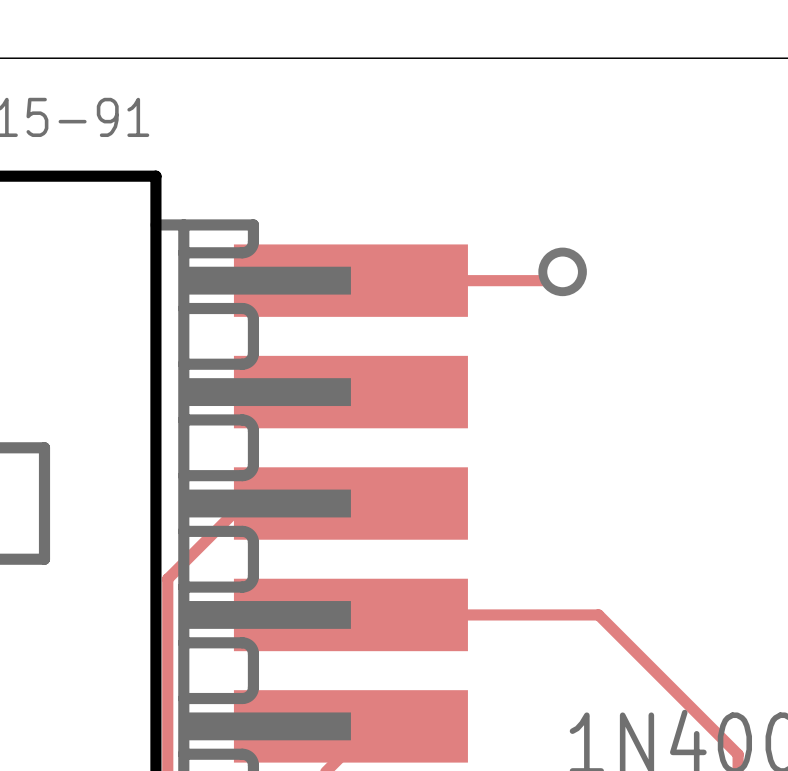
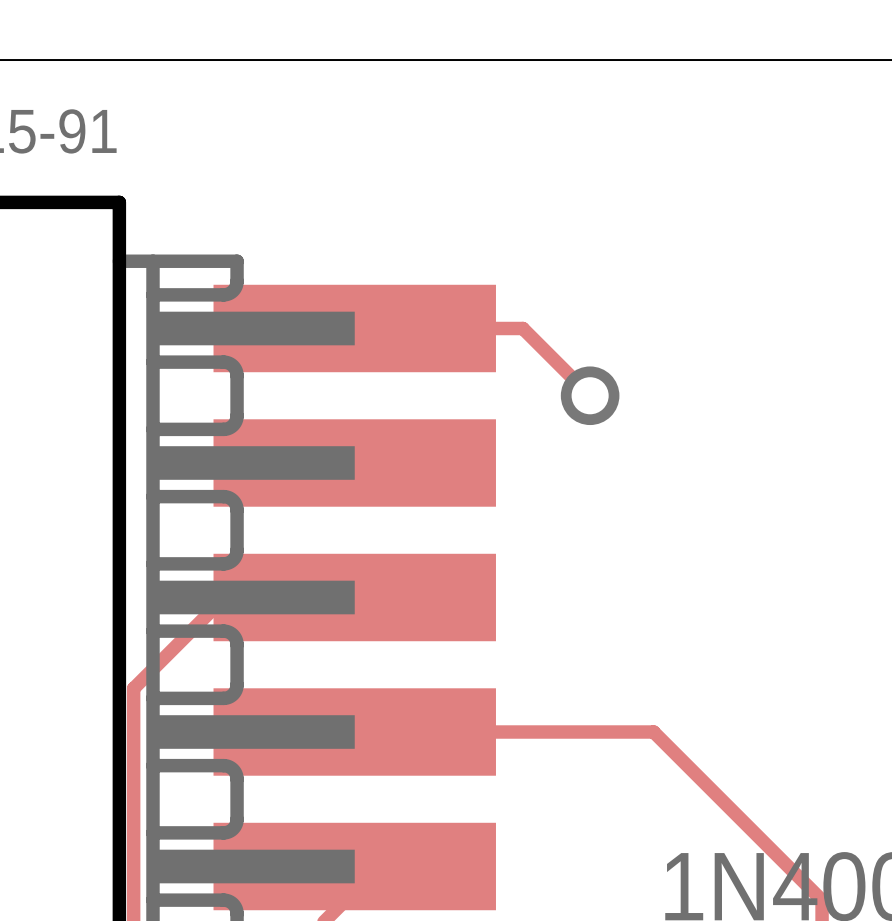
track: (562, 271) (562, 280) (490, 280) -> (590, 395) (522, 328)
via position: (562, 271) -> (590, 395)

